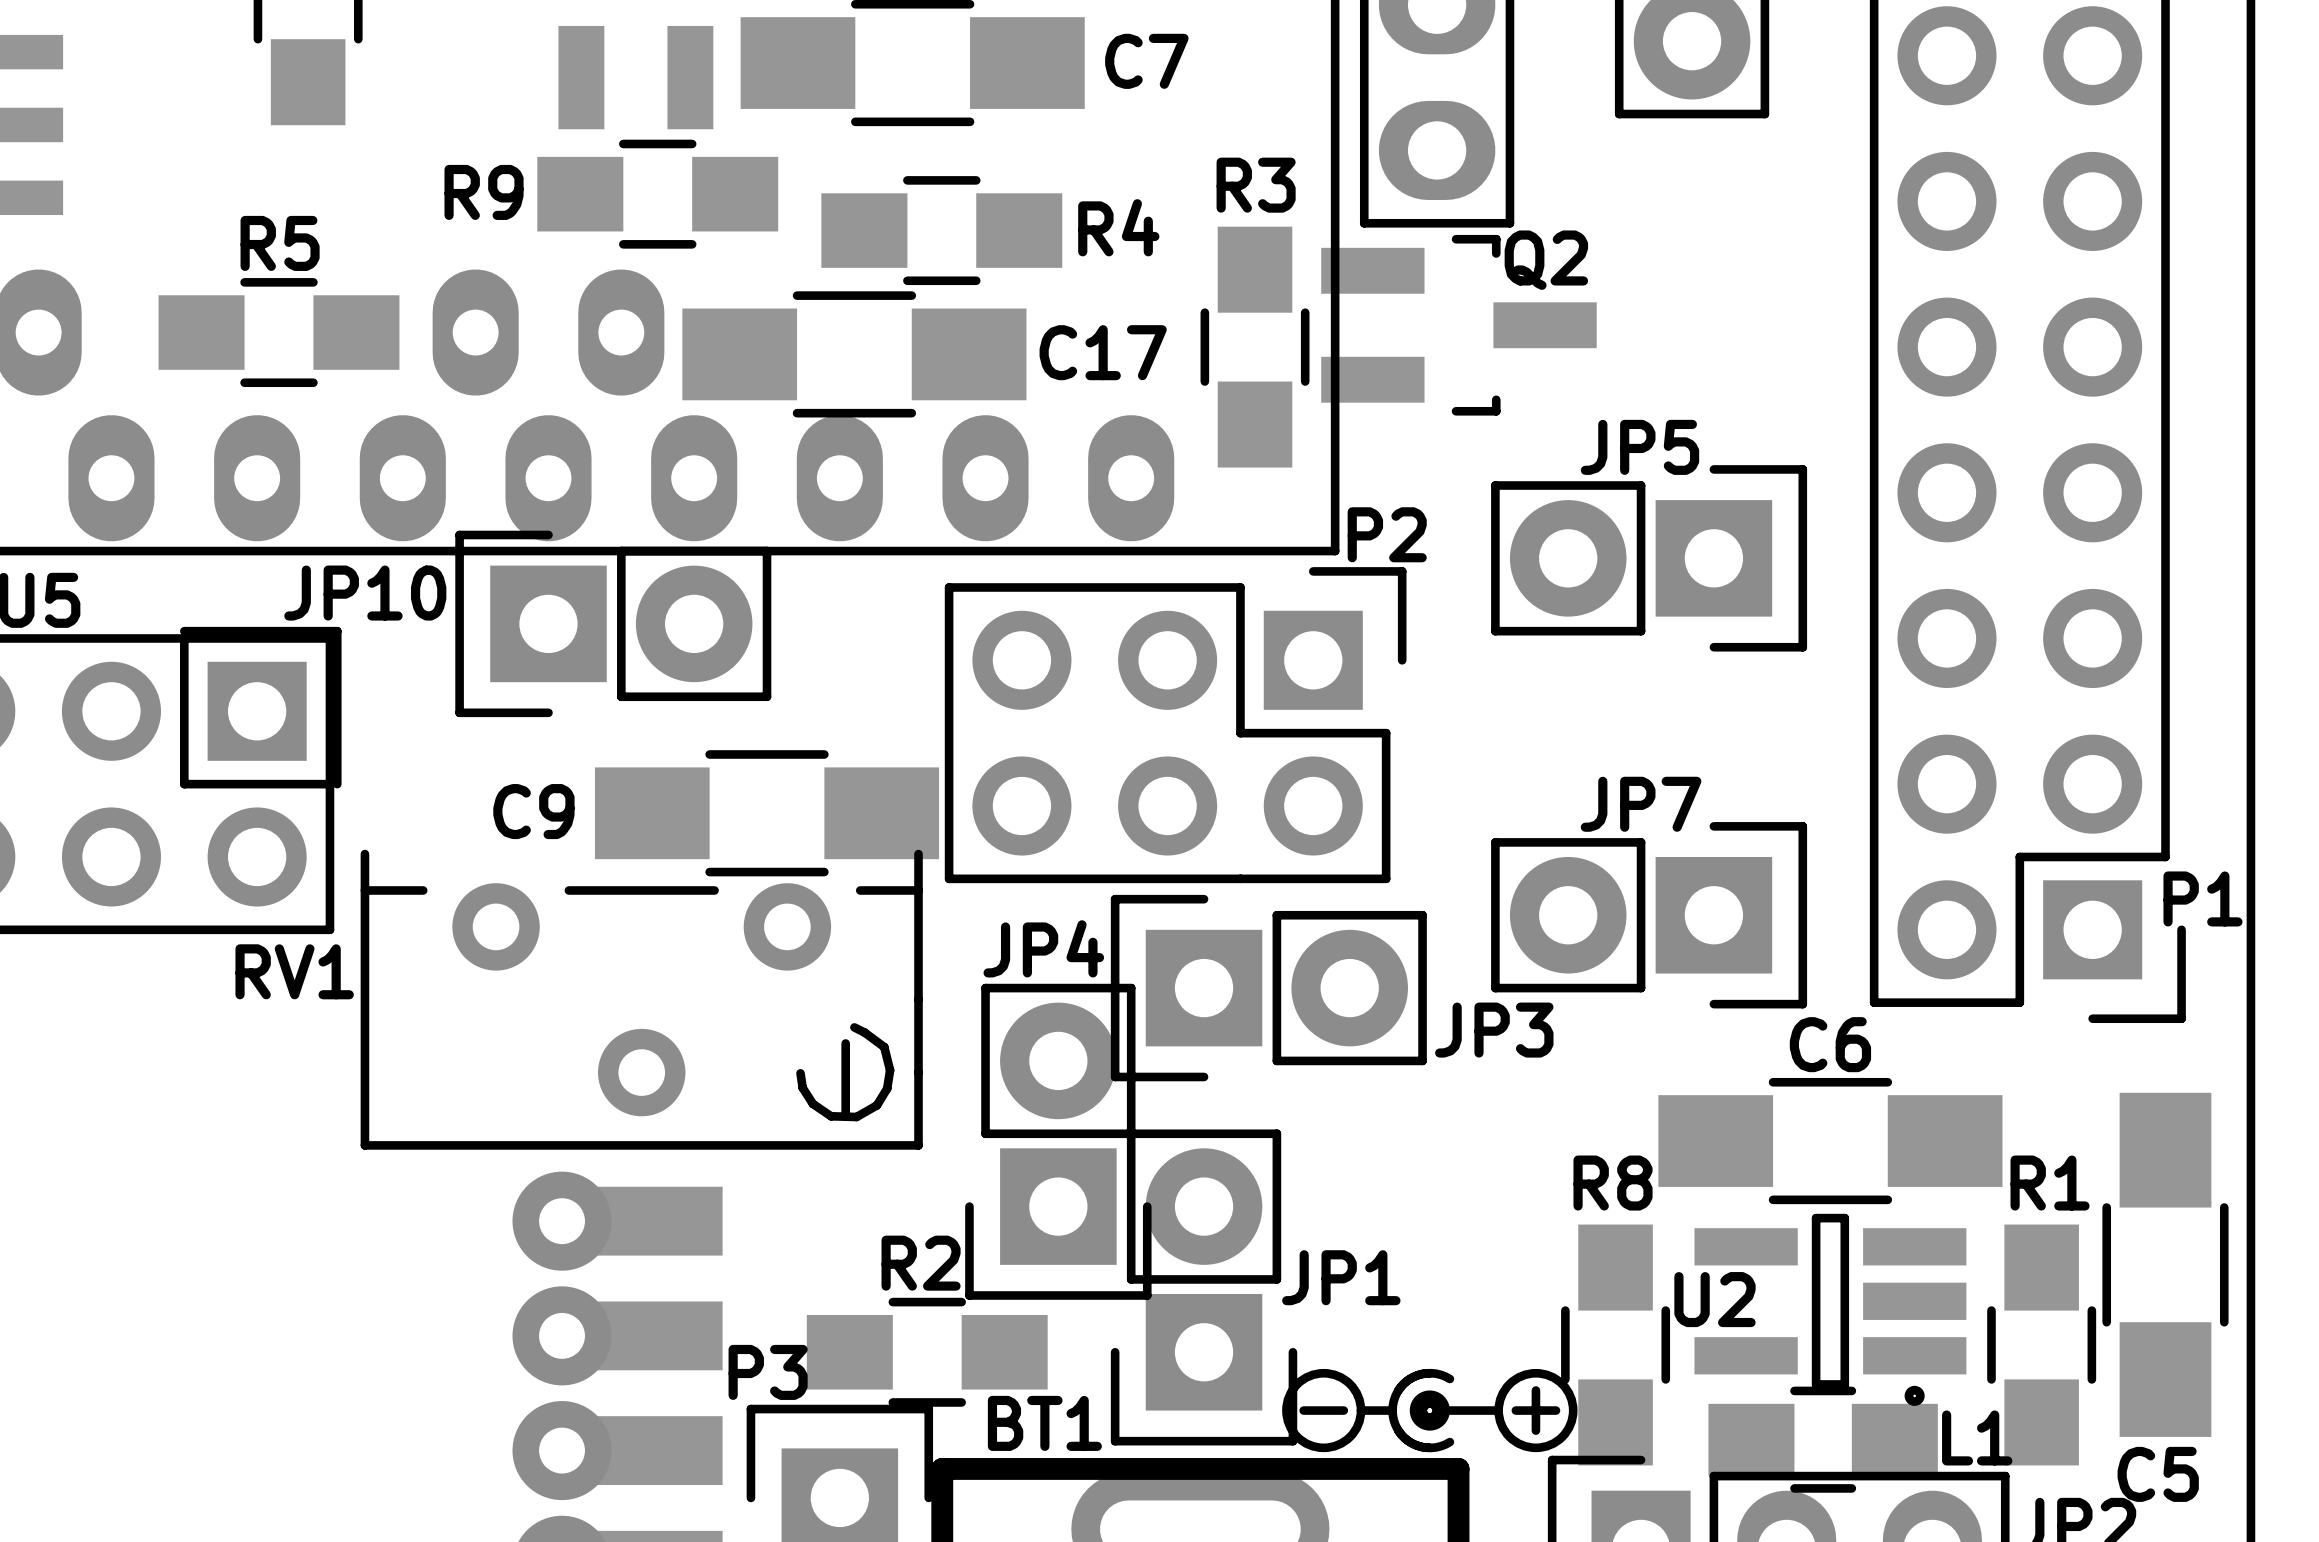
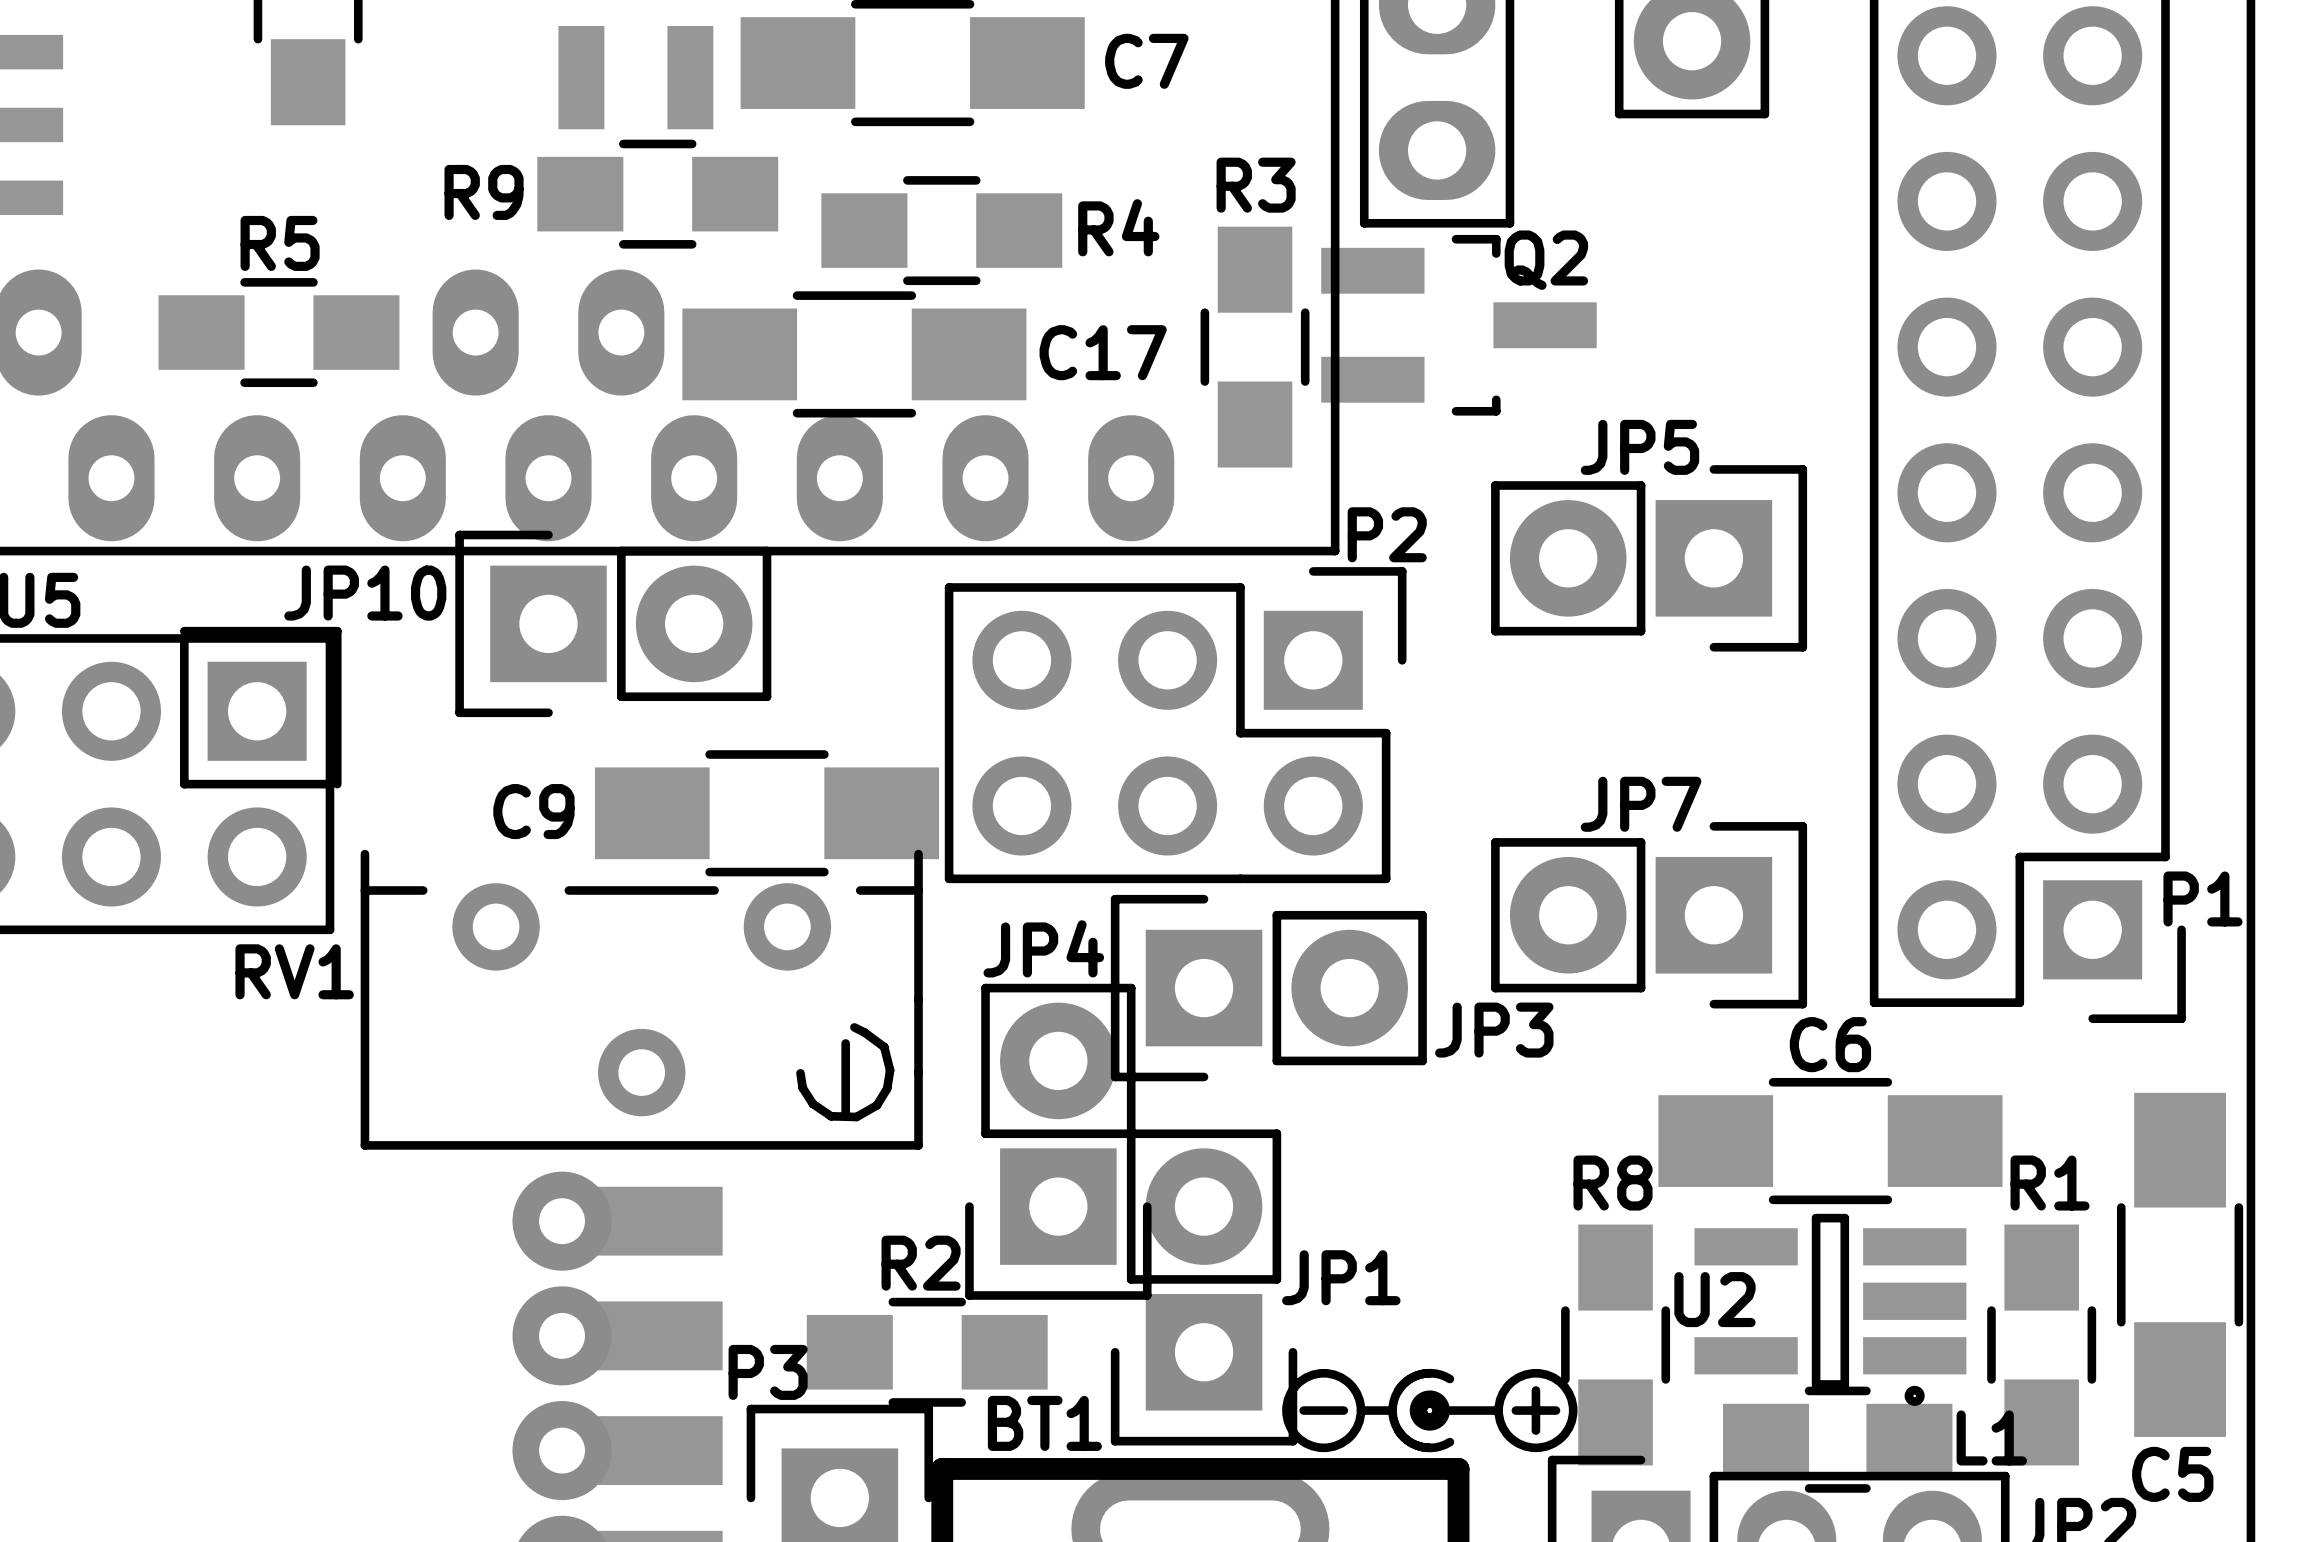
C5 position: (2165, 1264) -> (2180, 1264)
L1 position: (1823, 1439) -> (1837, 1439)

